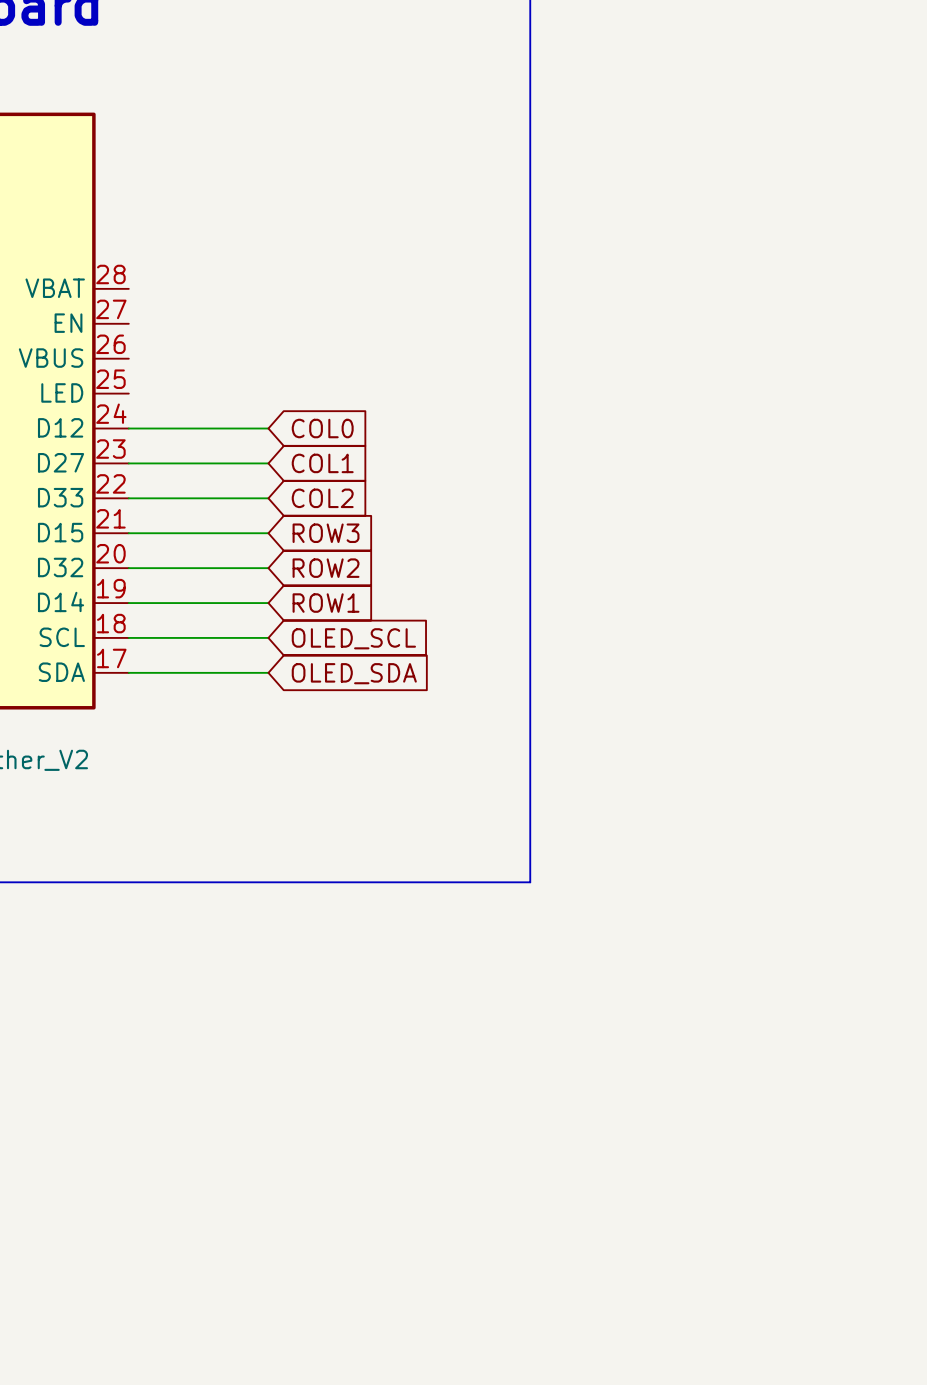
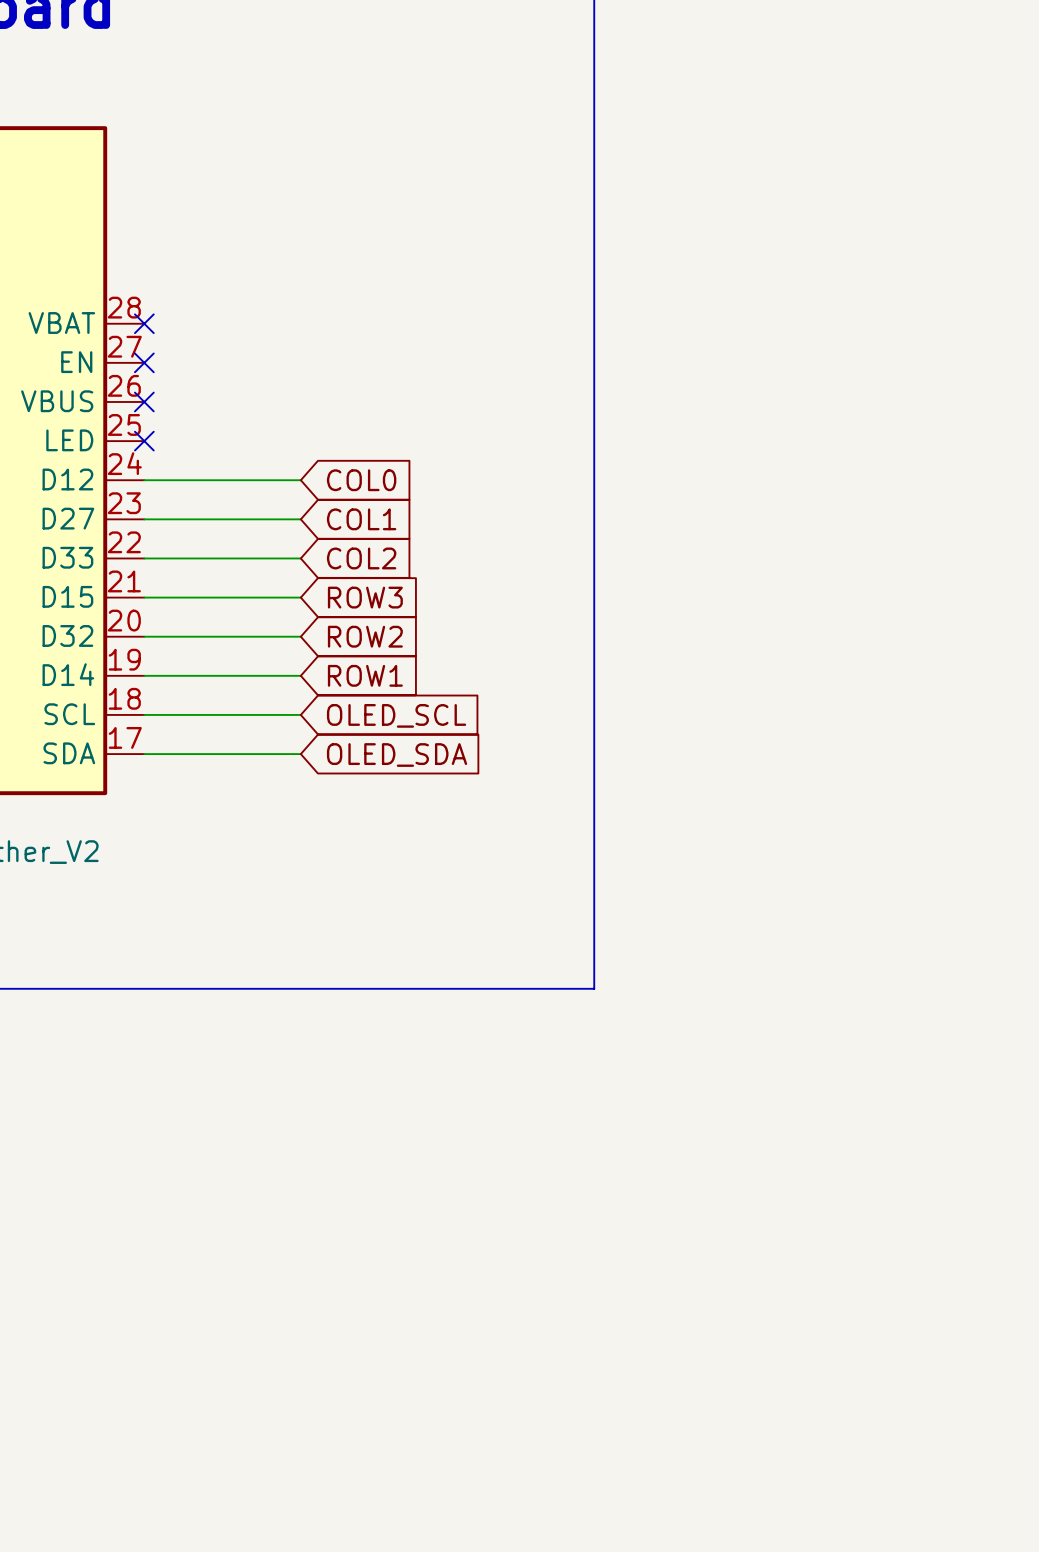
no-connect mark: none -> (144, 323)
no-connect mark: none -> (144, 362)
no-connect mark: none -> (144, 401)
no-connect mark: none -> (144, 441)

